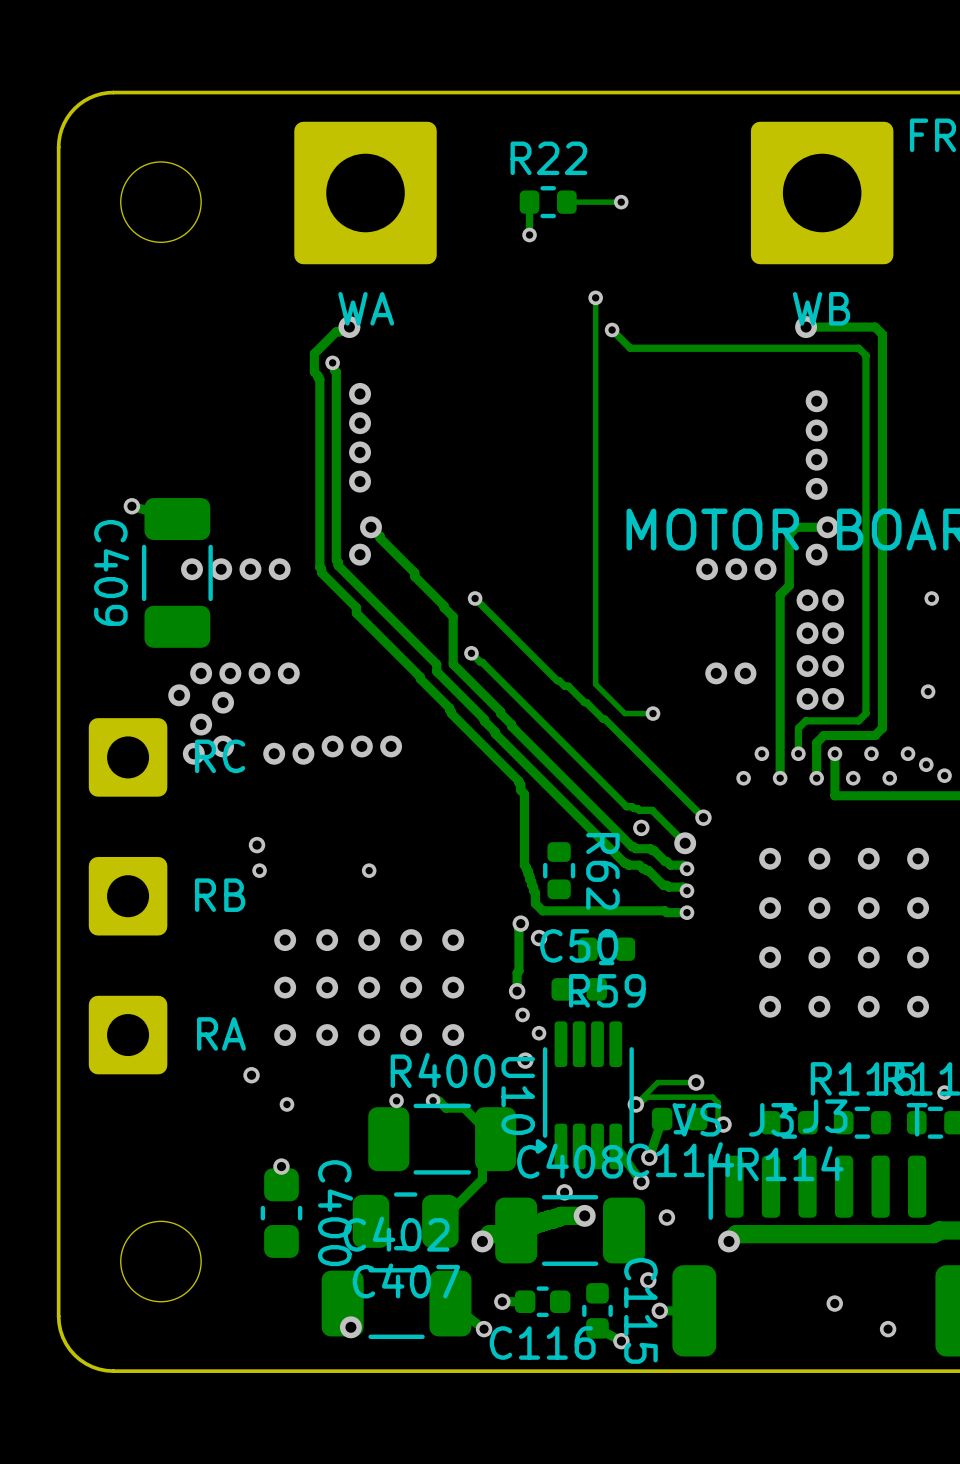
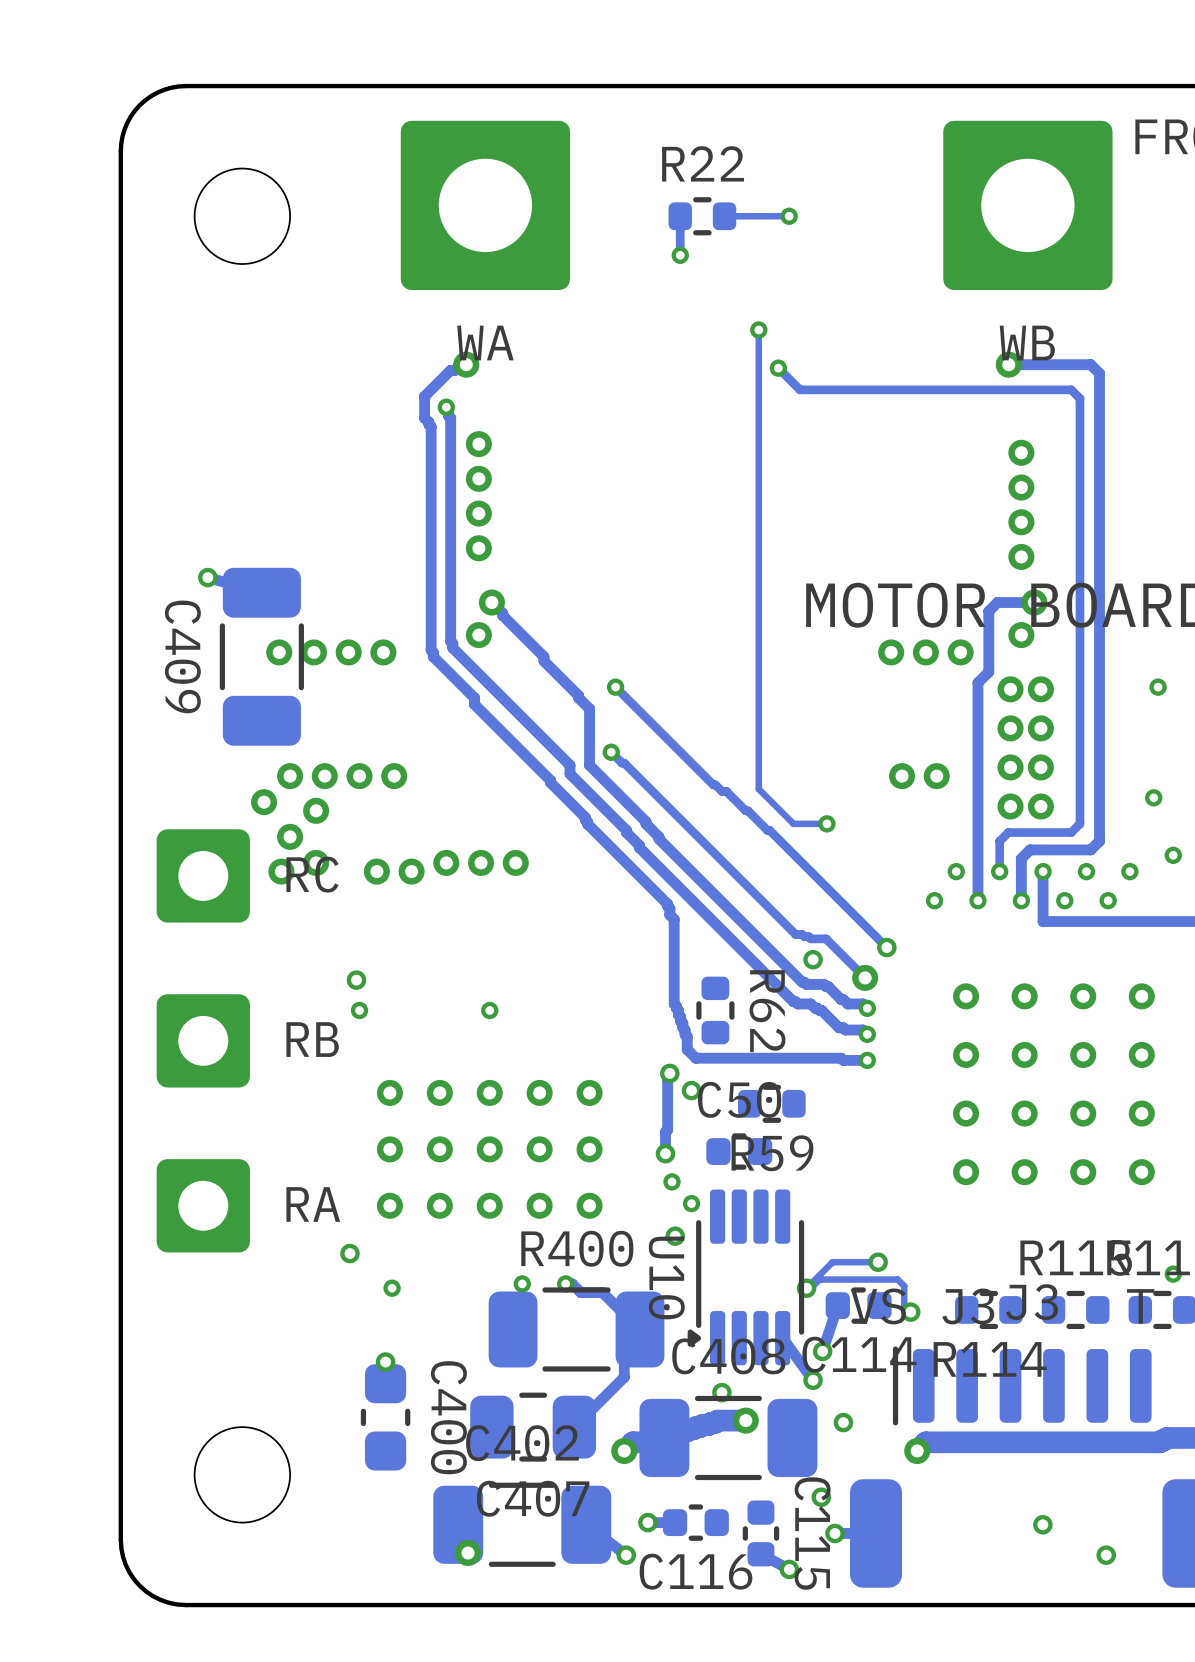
via: none -> (1173, 855)
via: (926, 764) -> none
via: (944, 775) -> none

